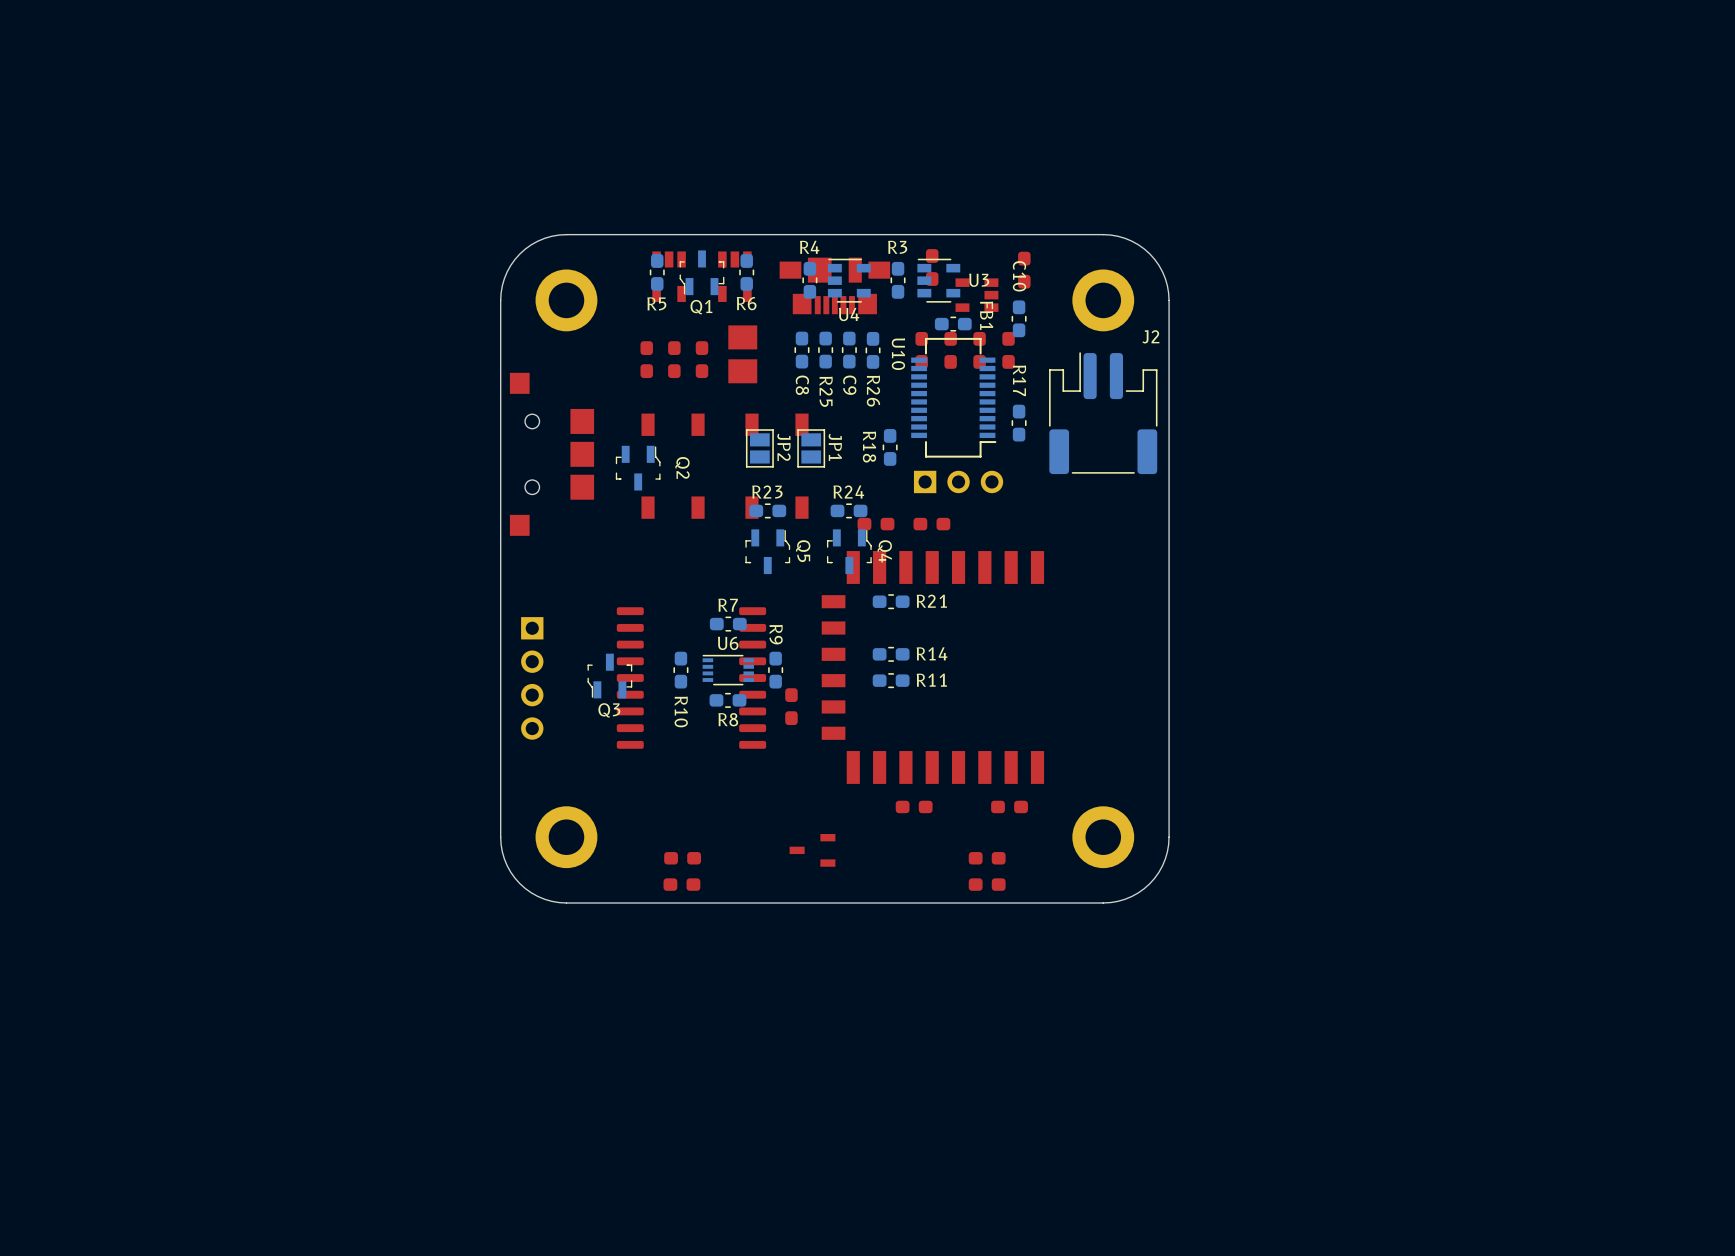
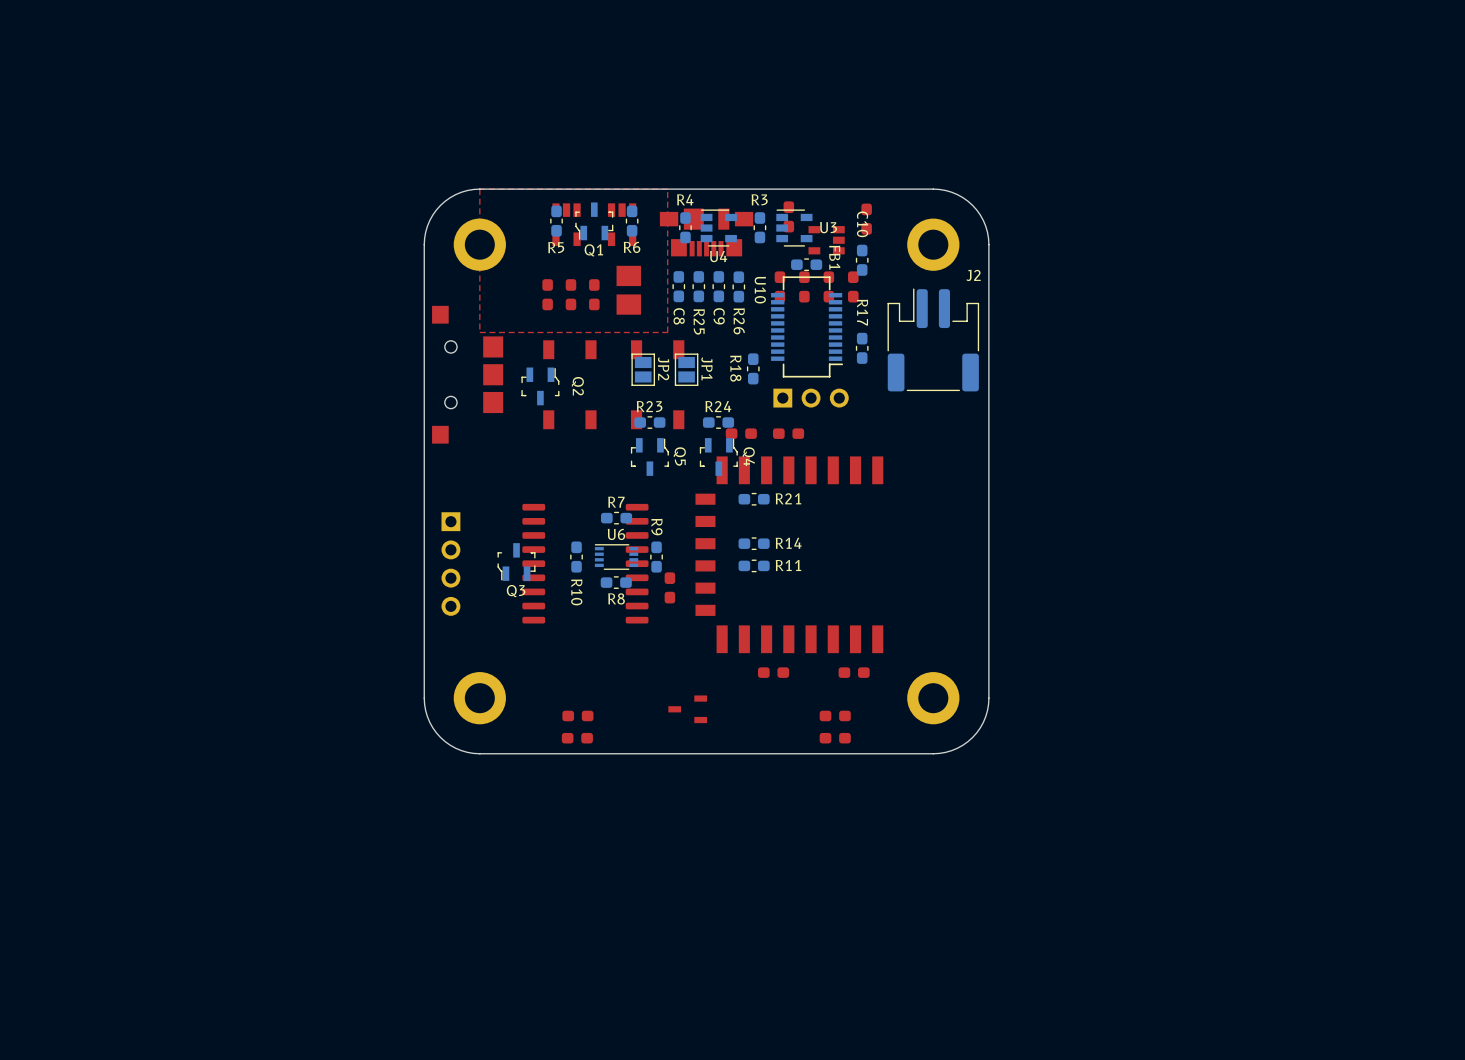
top zone outline: none -> (667, 189) (667, 332) (479, 332) (479, 189) (667, 189)

